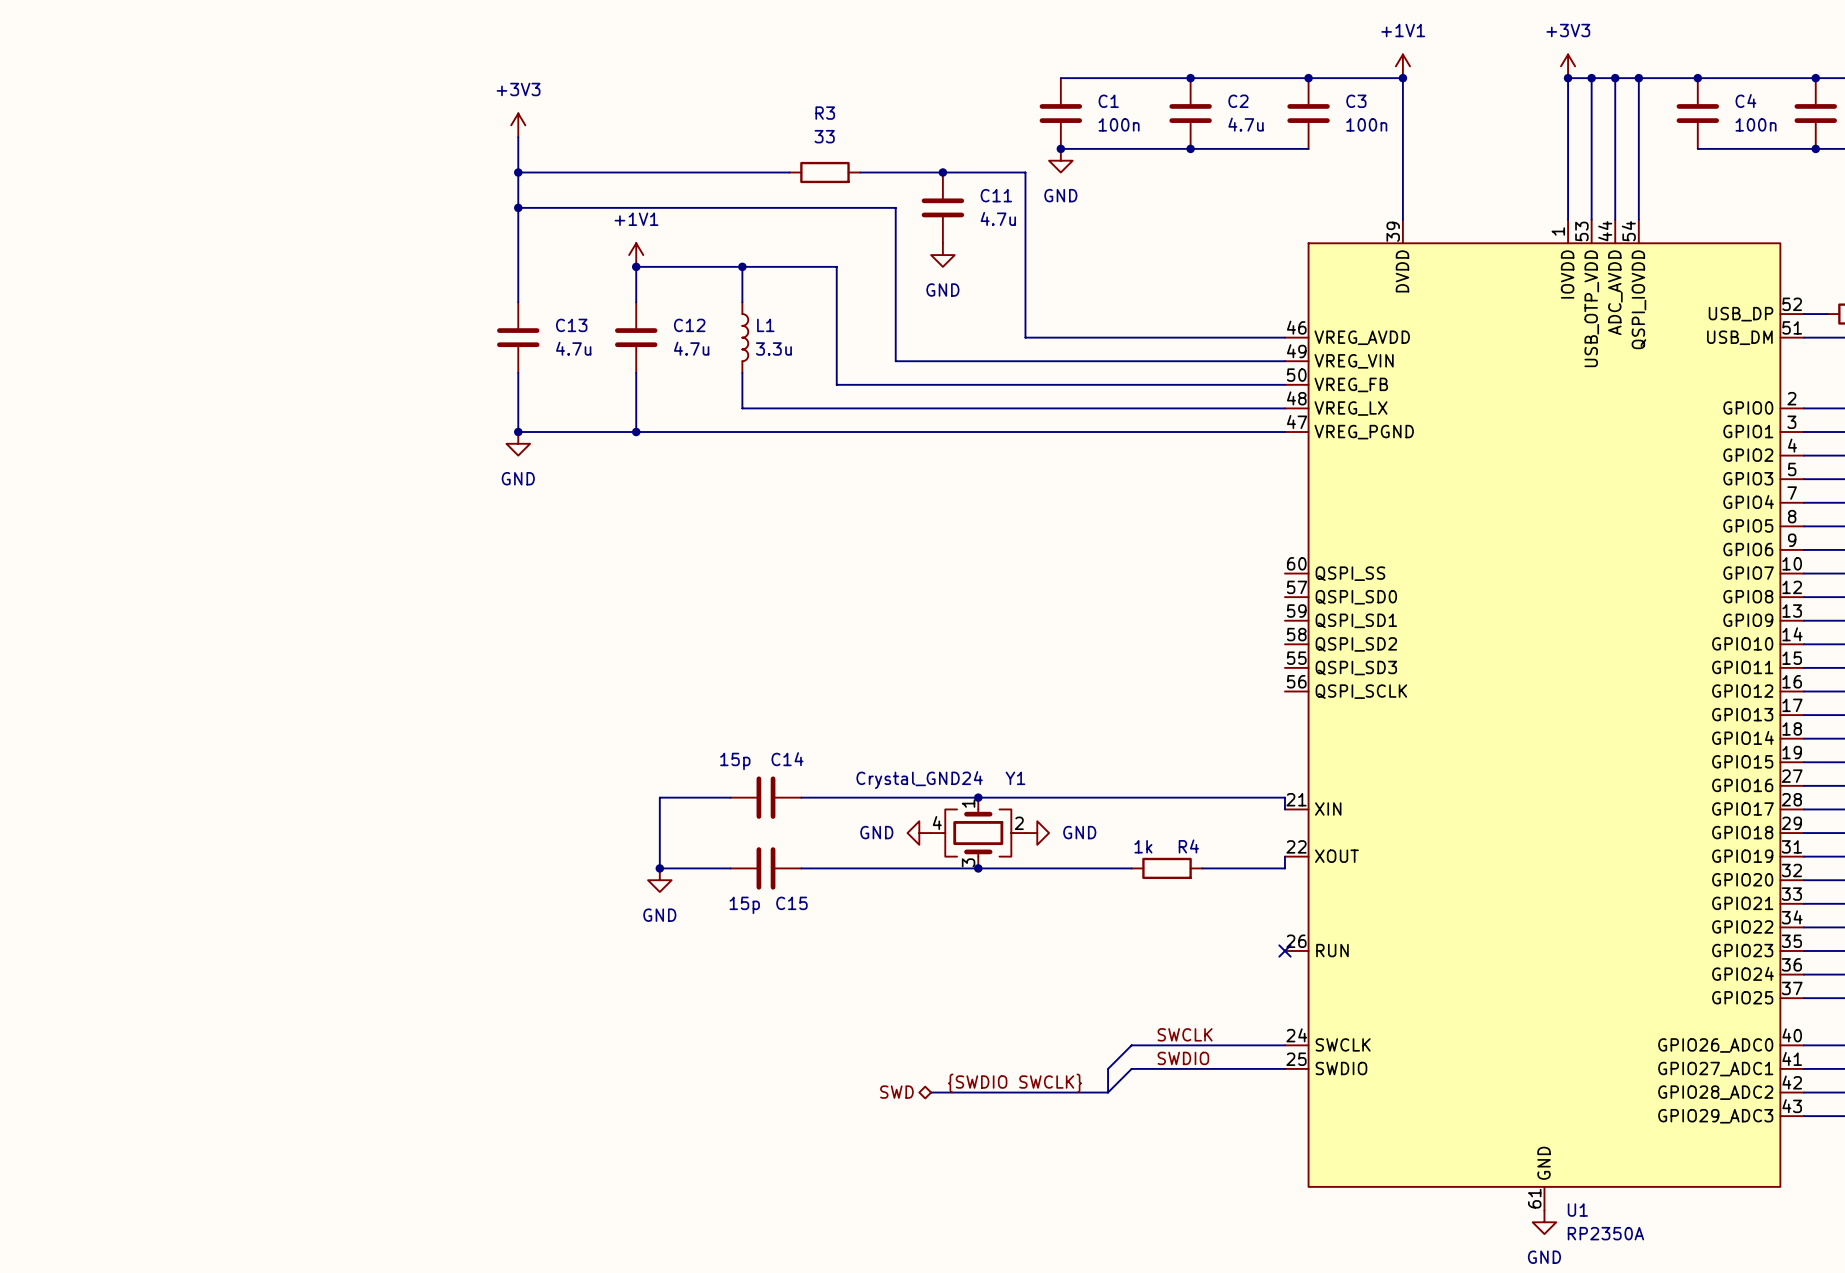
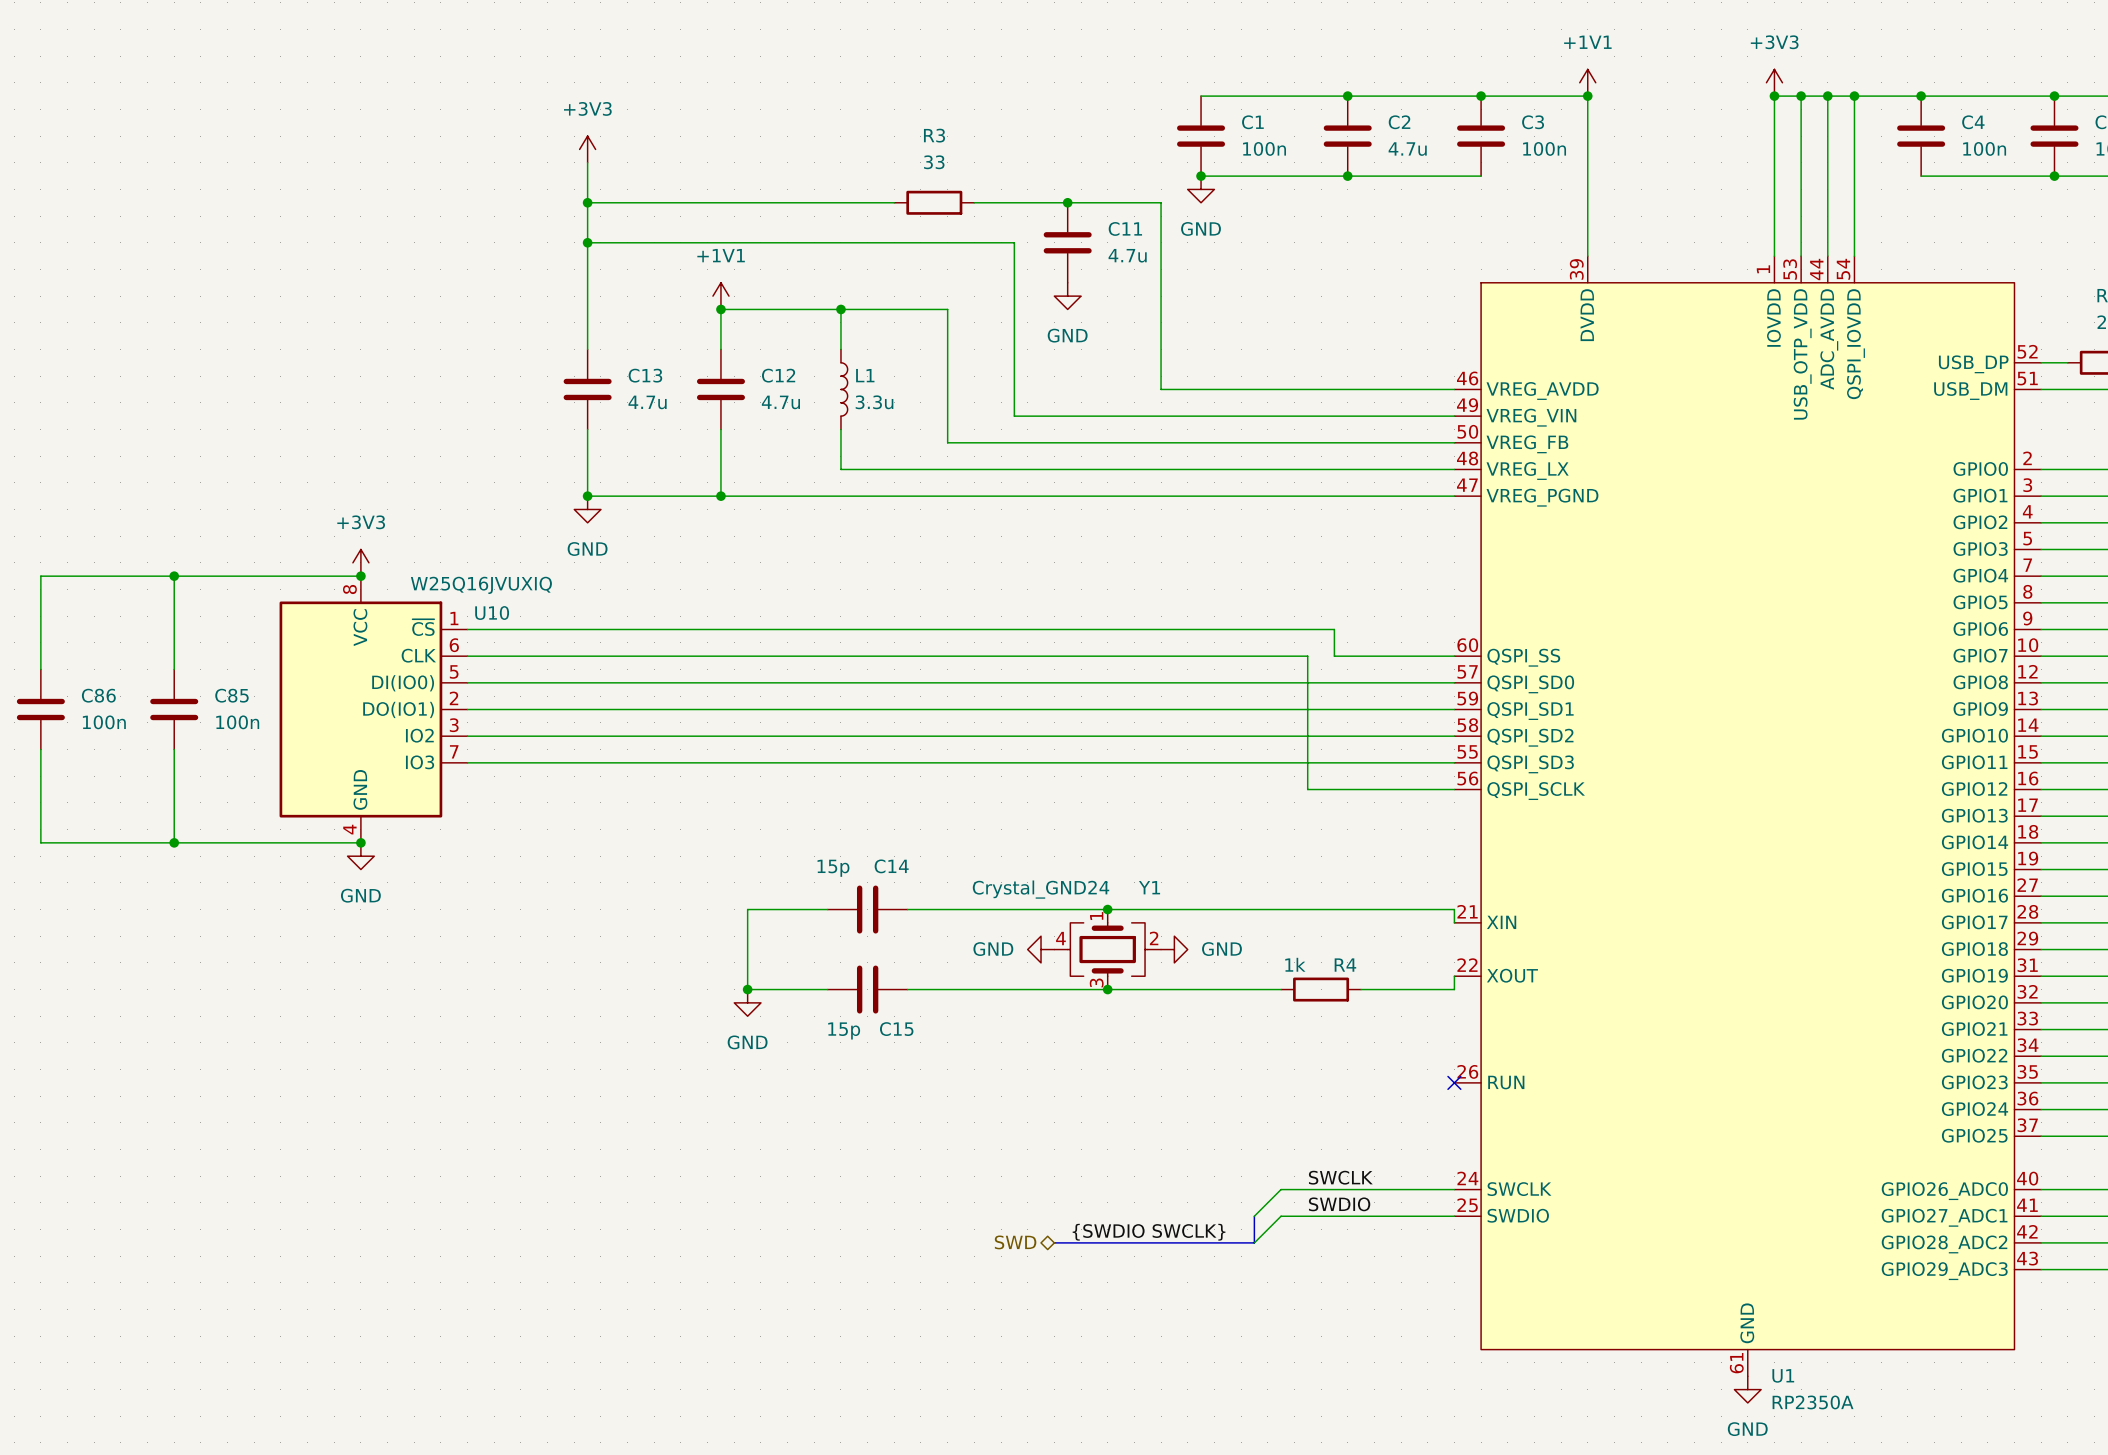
power symbol: none -> +3V3 (360, 562)
wire: none -> (174, 576) (174, 669)
junction: none -> (174, 576)
wire: none -> (360, 576) (40, 576) (40, 669)
junction: none -> (360, 576)
wire: none -> (467, 629) (1334, 629) (1334, 656) (1454, 656)
wire: none -> (467, 656) (1307, 656) (1307, 789) (1454, 789)
wire: none -> (467, 682) (1454, 682)
C86: none -> 100n (40, 709)
C85: none -> 100n (174, 709)
U10: none -> W25Q16JVUXIQ (373, 709)
wire: none -> (467, 709) (1454, 709)
wire: none -> (467, 736) (1454, 736)
wire: none -> (40, 749) (40, 842) (360, 842)
wire: none -> (174, 749) (174, 842)
wire: none -> (467, 762) (1454, 762)
junction: none -> (174, 842)
junction: none -> (360, 842)
power symbol: none -> GND (360, 856)

